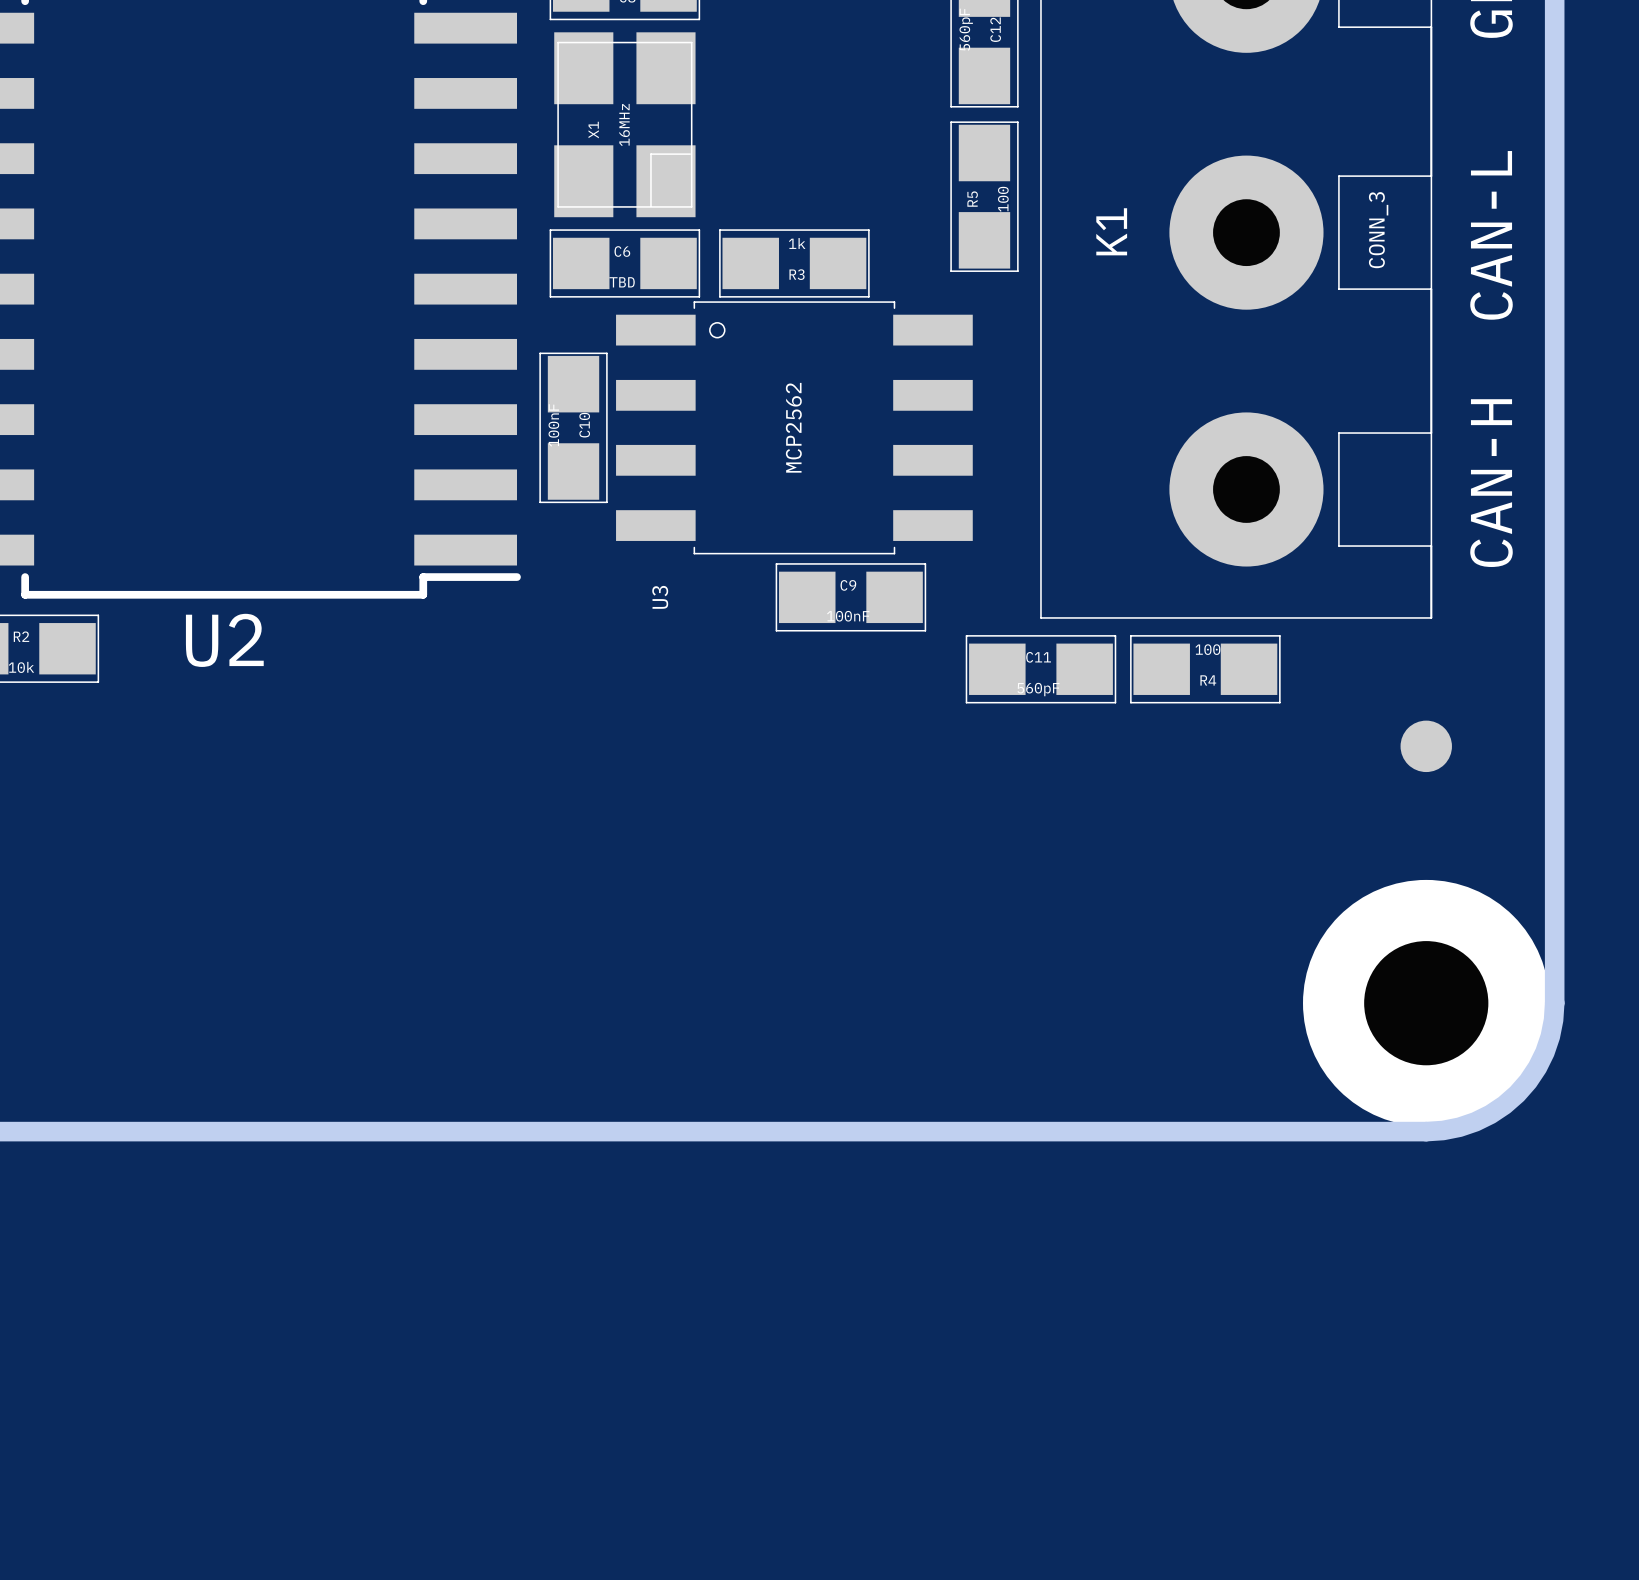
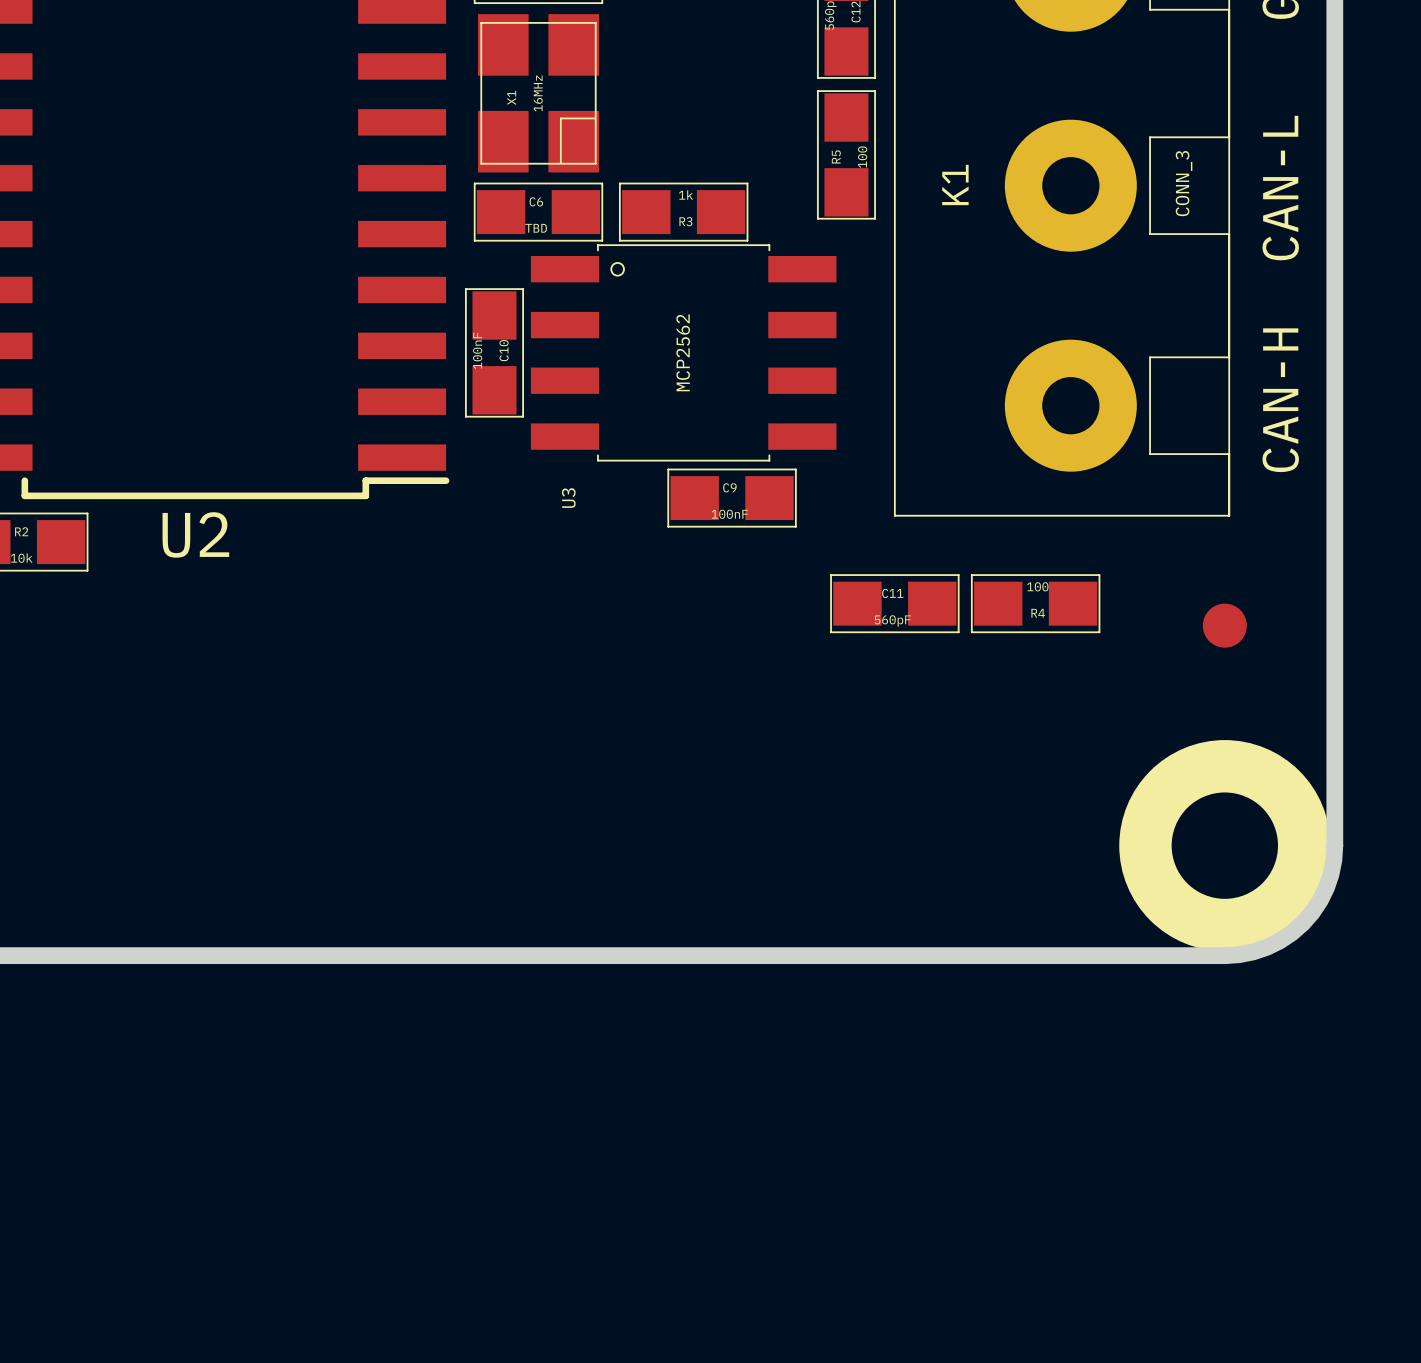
C11 position: (1040, 669) -> (894, 603)
R4 position: (1205, 669) -> (1035, 603)

